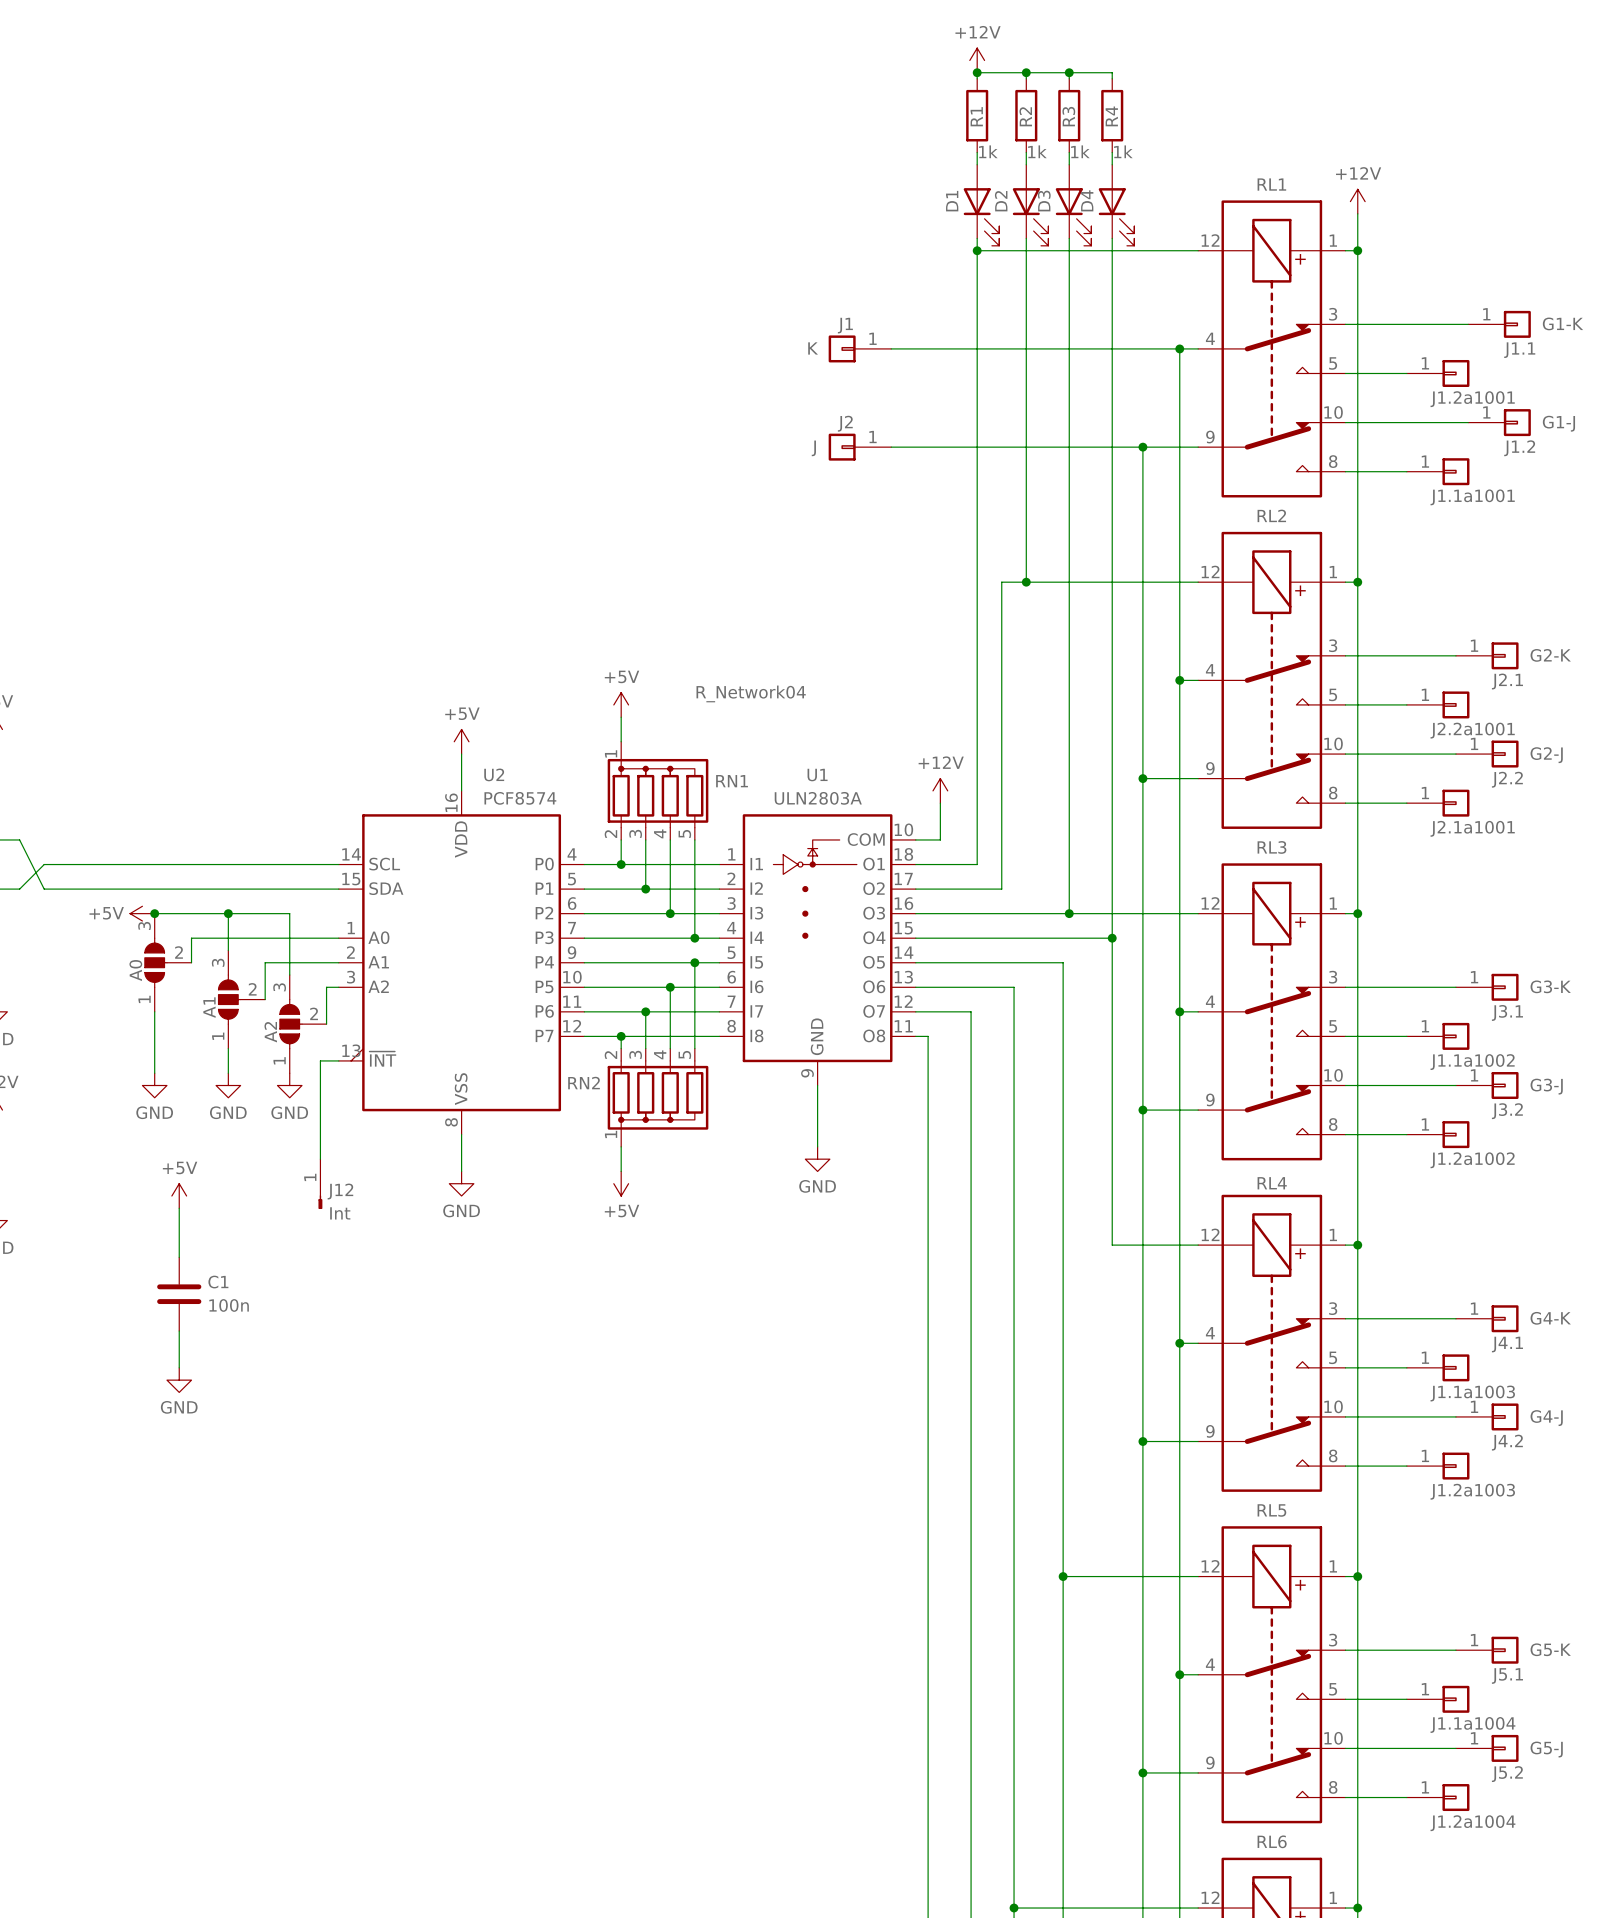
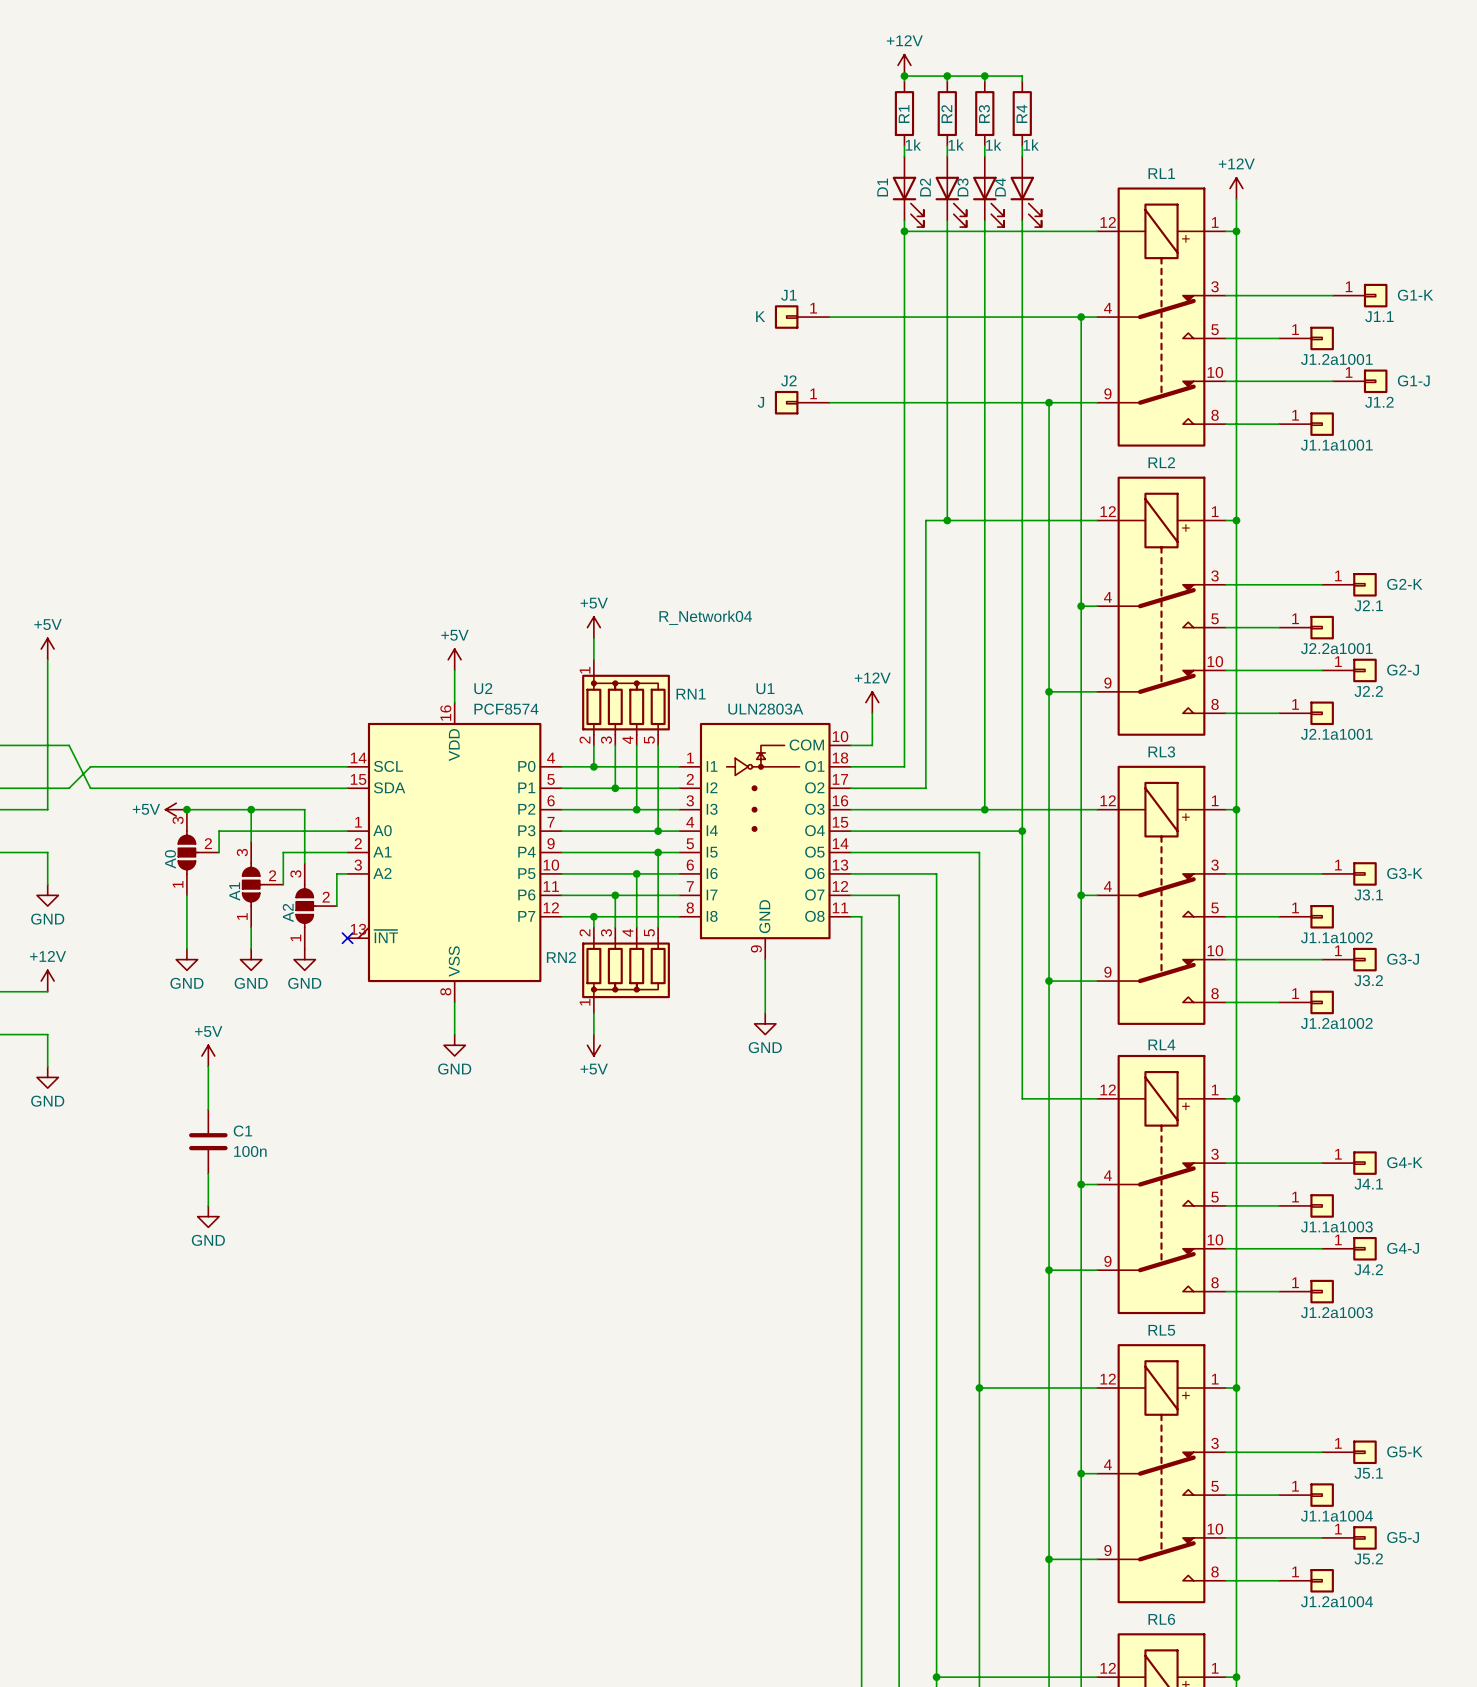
wire: (338, 1060) (320, 1060) (320, 1159) -> none
no-connect mark: none -> (347, 938)
J12: Int (320, 1184) -> none

